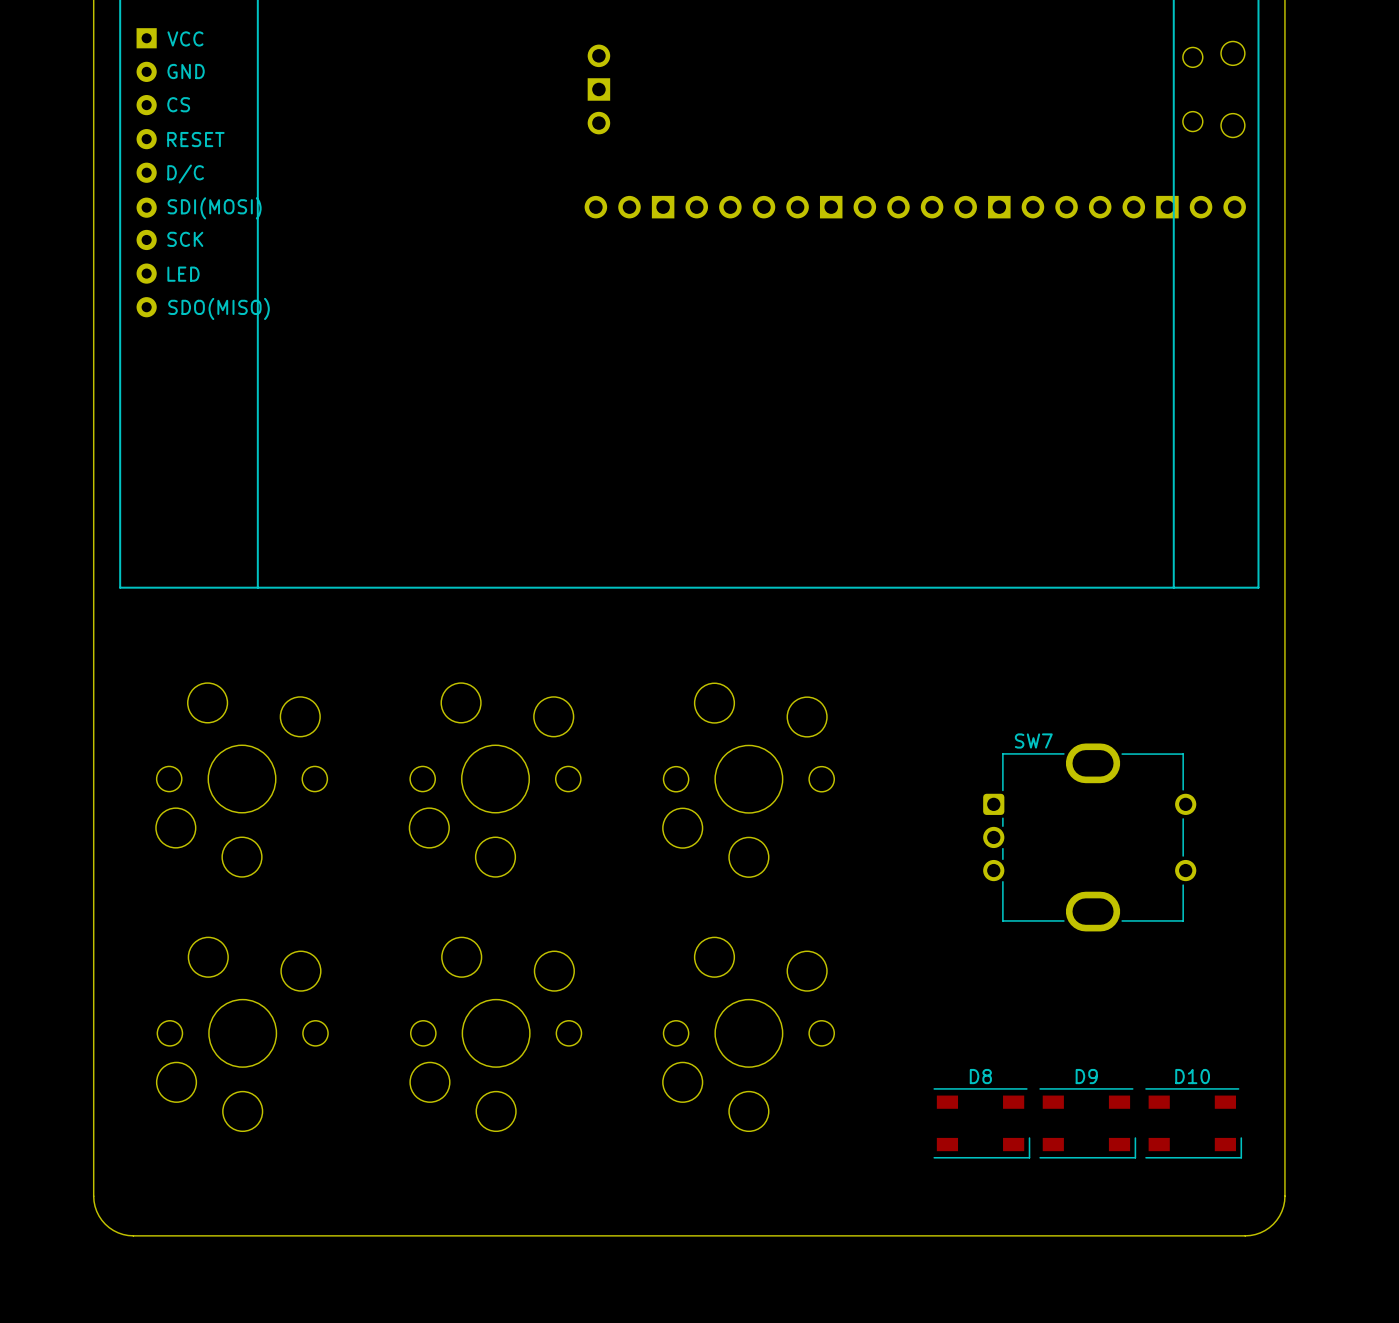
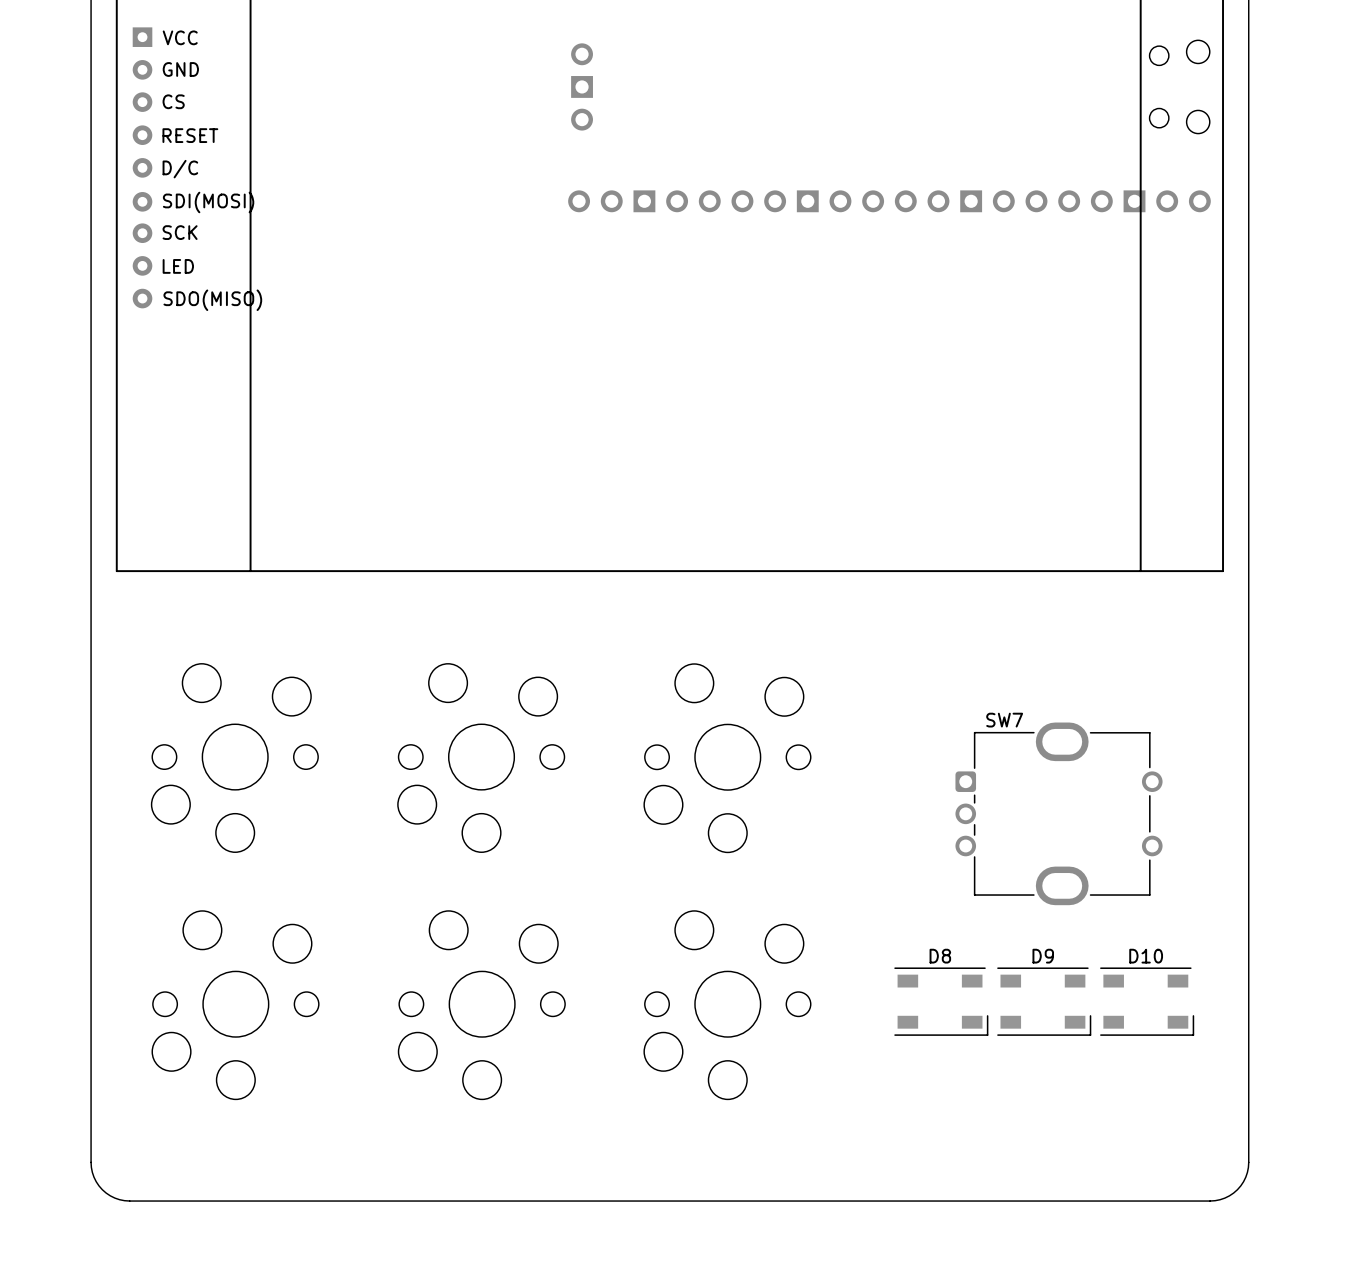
D8 position: (981, 1123) -> (941, 1001)
D9 position: (1087, 1123) -> (1044, 1001)
D10 position: (1193, 1123) -> (1147, 1001)

